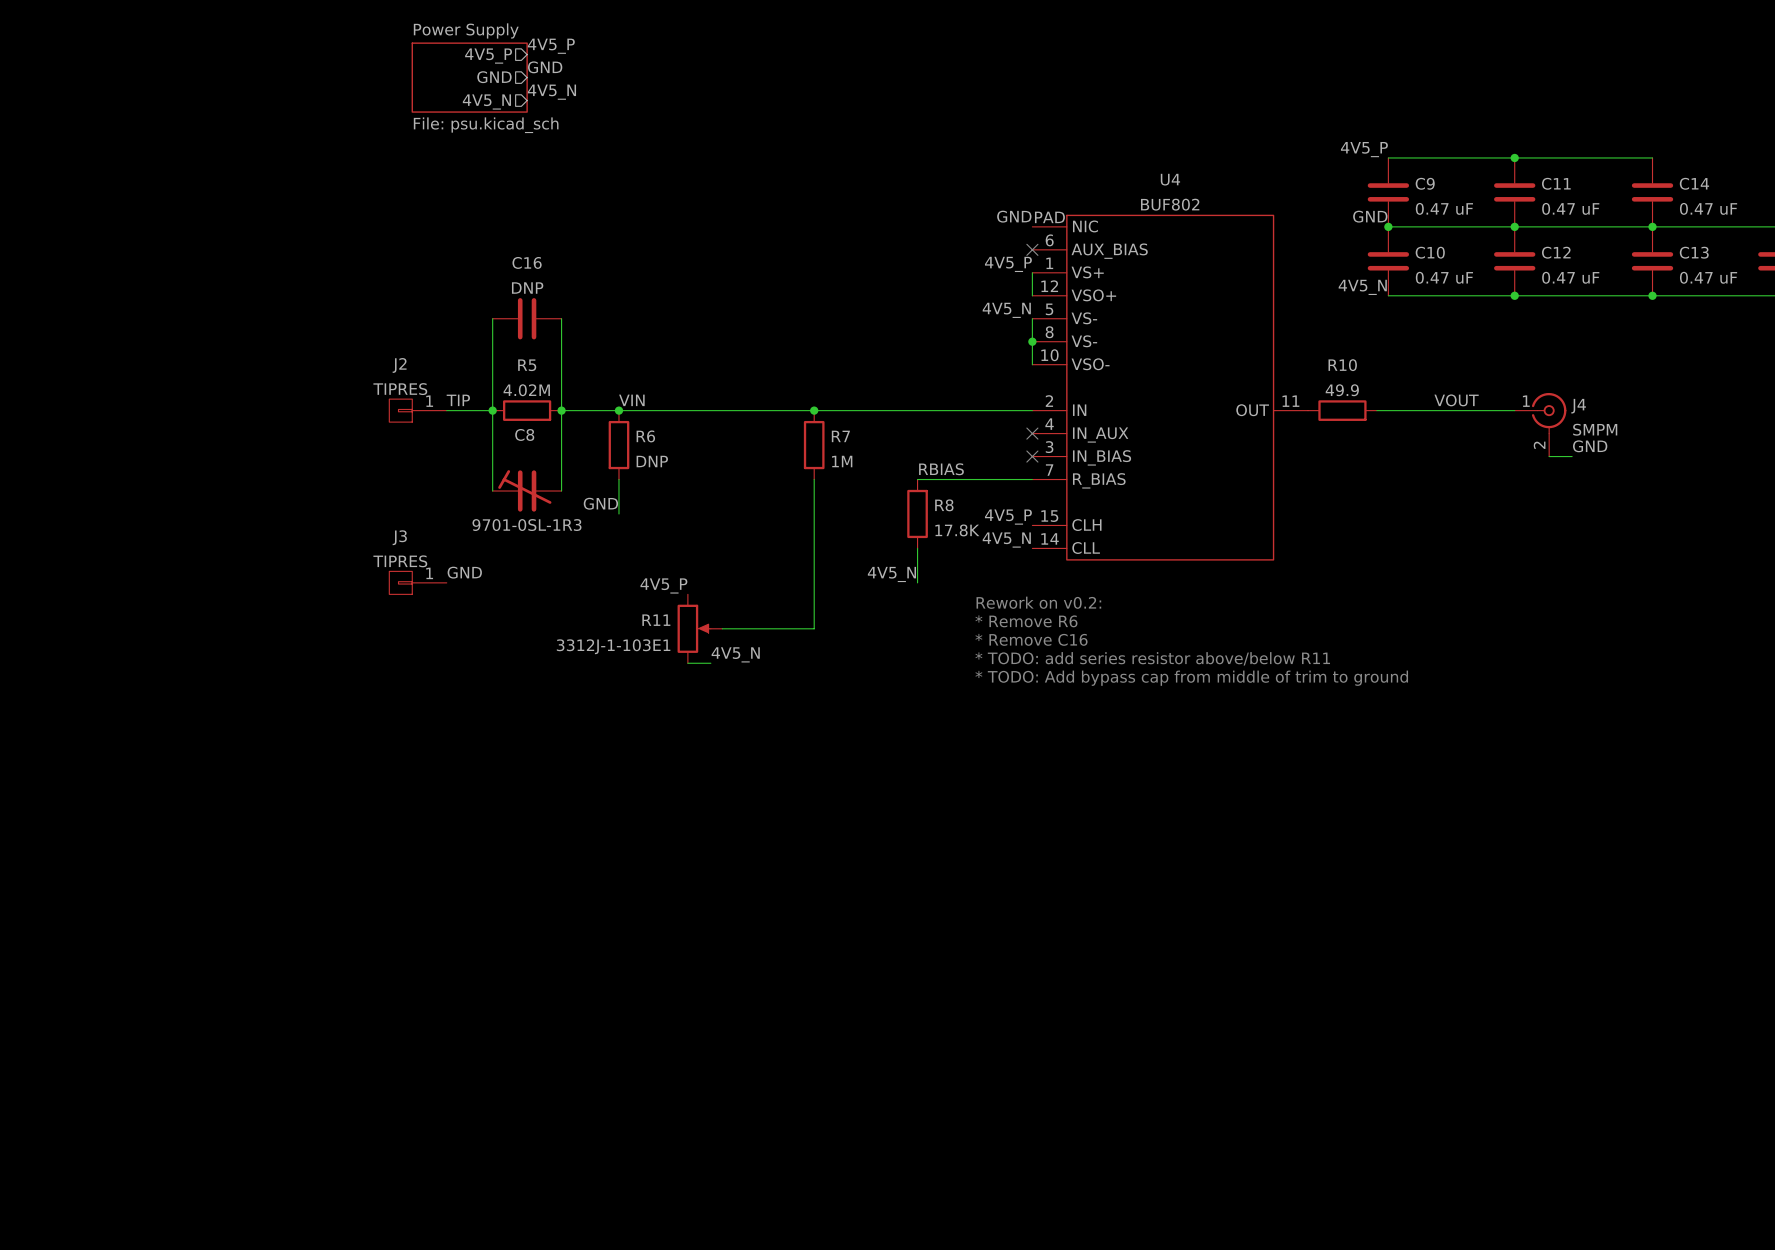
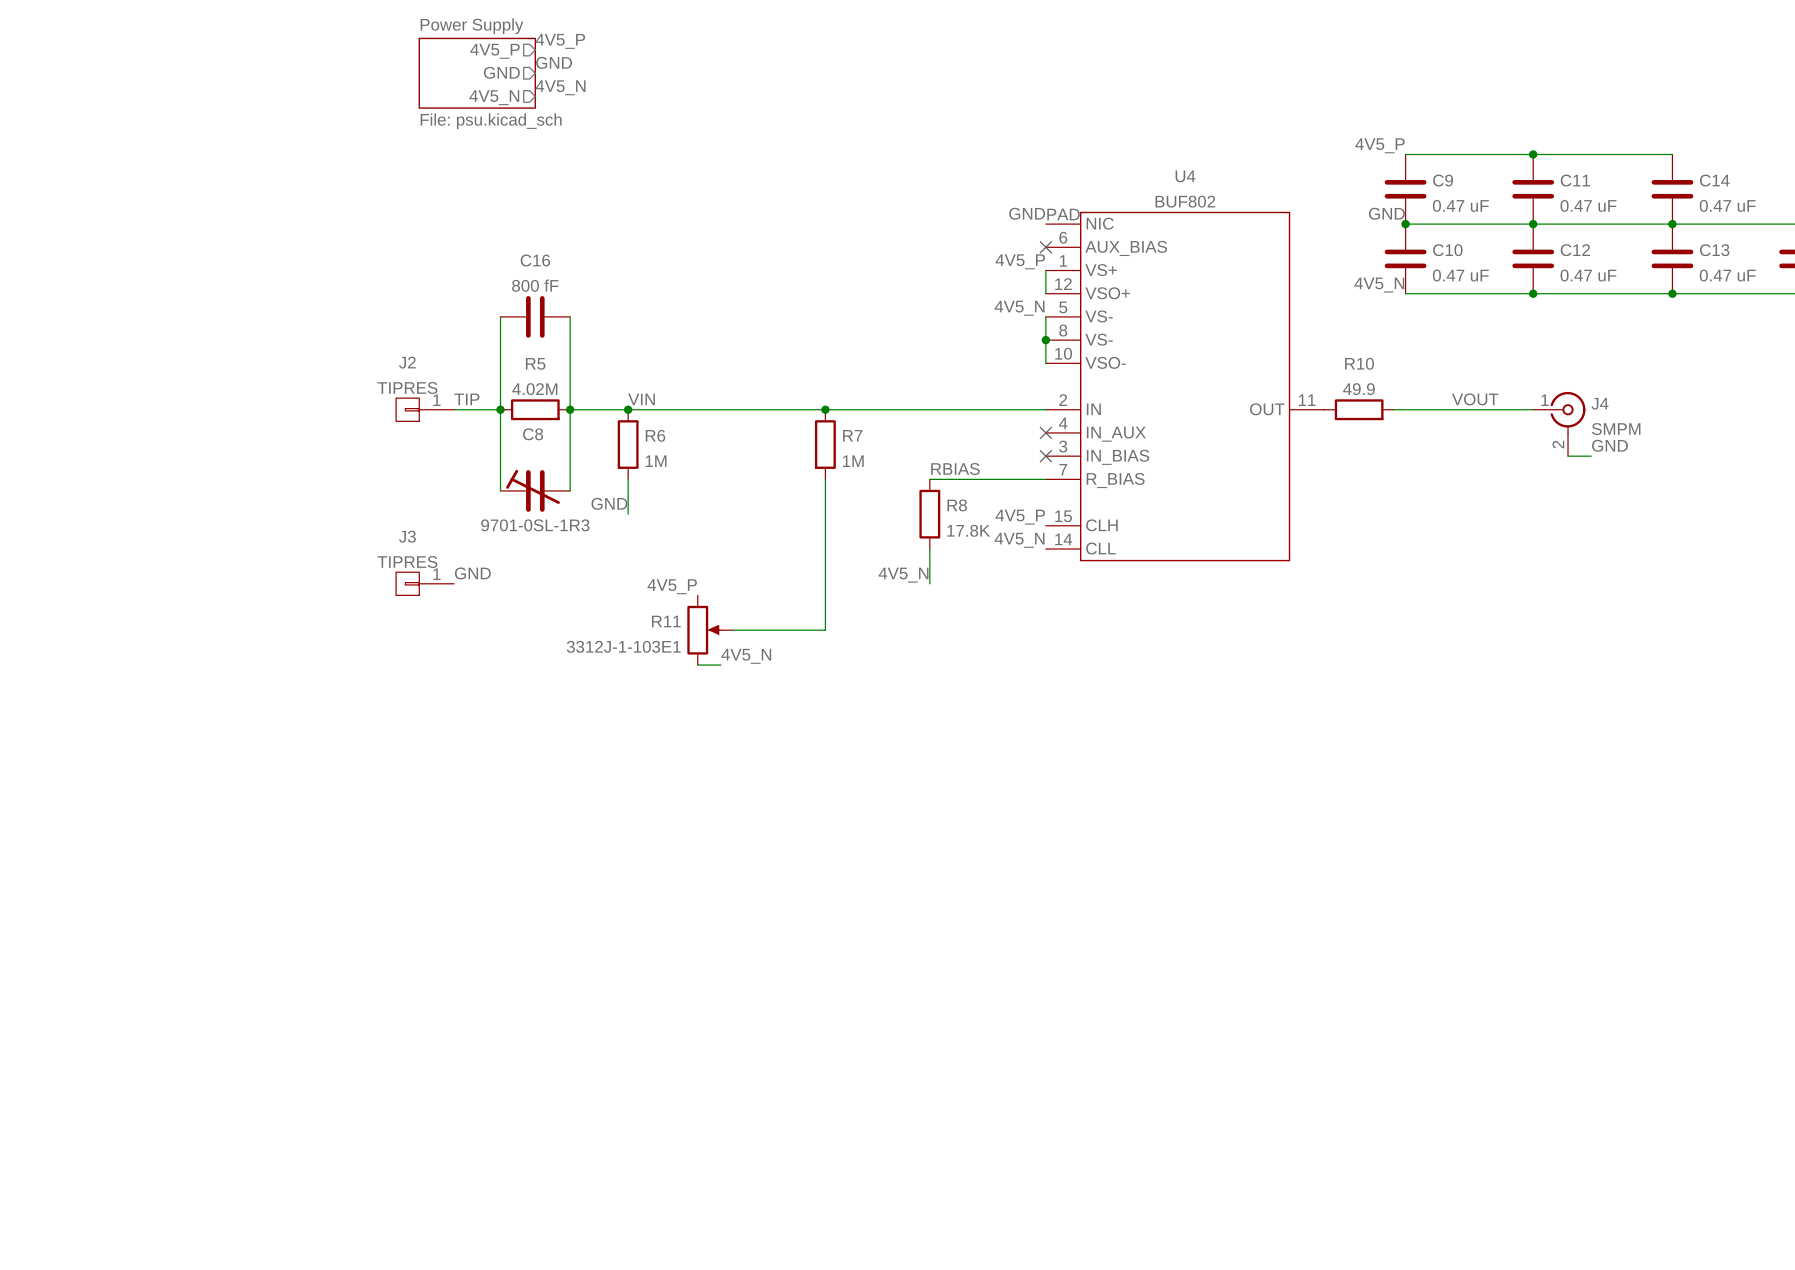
C16 value: DNP (527, 288) -> 800 fF (535, 285)
R6 value: DNP (652, 461) -> 1M (656, 461)
text: Rework on v0.2: (1038, 602) -> none
text: * Remove R6 (1026, 621) -> none
text: * Remove C16 (1031, 639) -> none
text: * TODO: add series resistor above/below R11 (1152, 658) -> none
text: * TODO: Add bypass cap from middle of trim to ground (1191, 678) -> none

